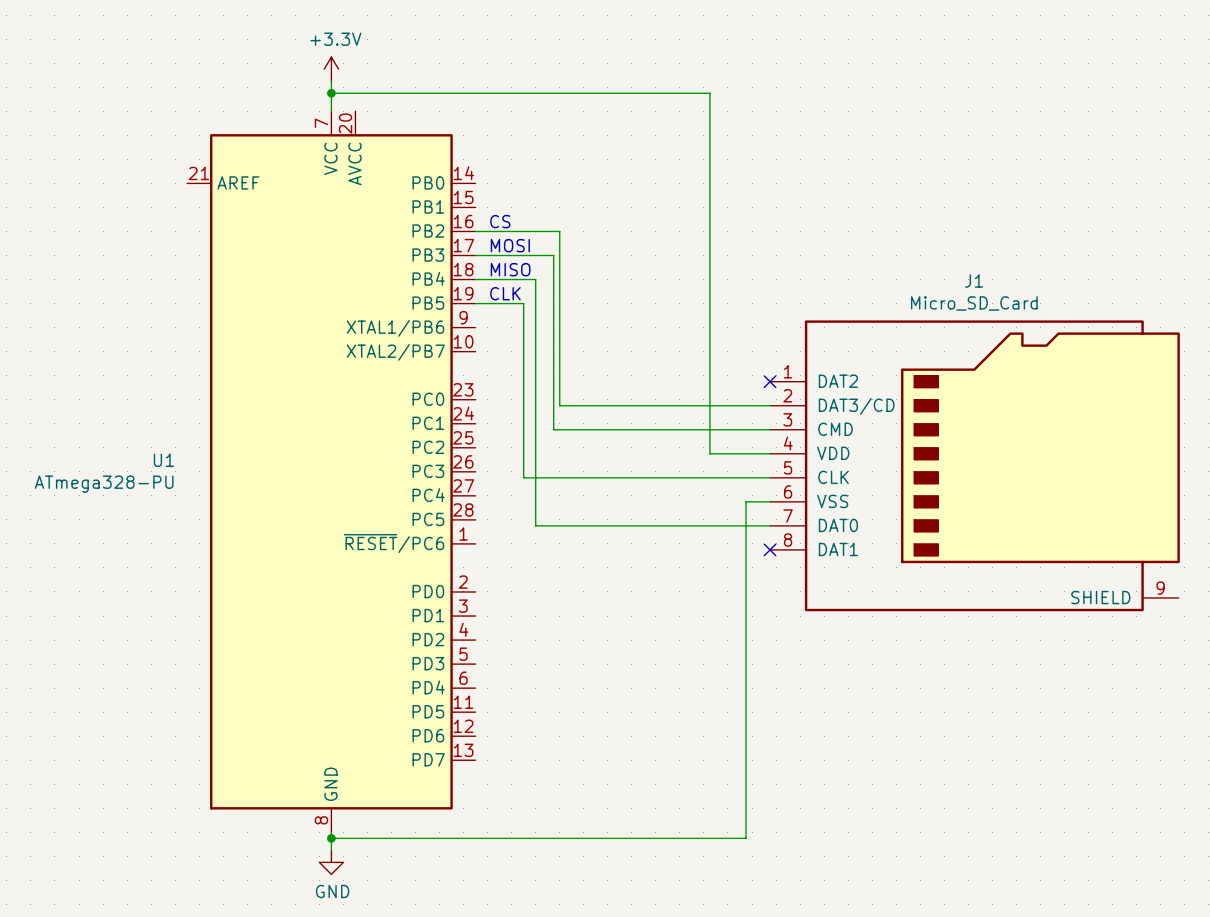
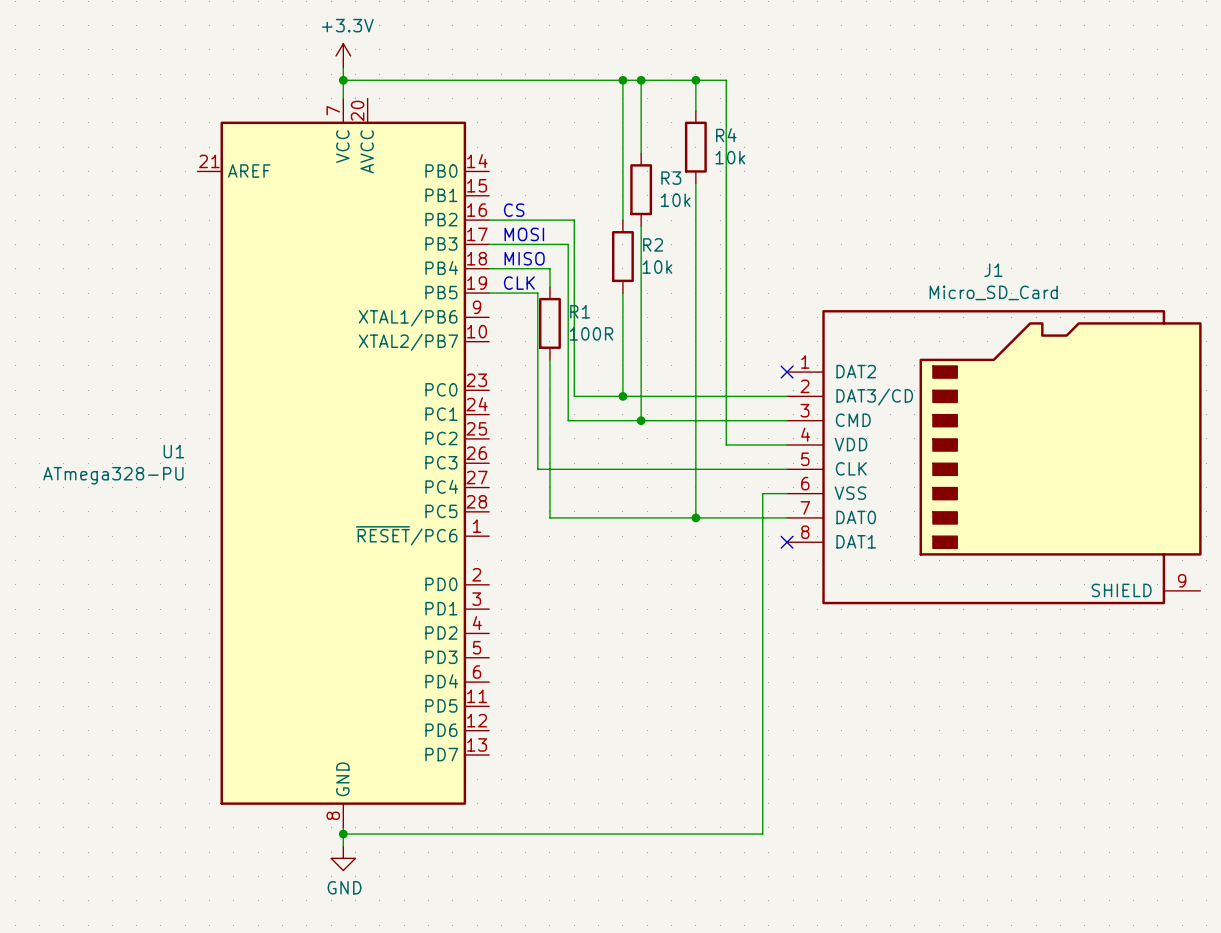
wire: none -> (622, 80) (622, 220)
junction: none -> (622, 80)
junction: none -> (641, 80)
wire: none -> (695, 80) (695, 110)
junction: none -> (695, 80)
R4: none -> 10k (695, 147)
wire: none -> (695, 183) (695, 517)
R3: none -> 10k (641, 189)
wire: none -> (641, 226) (641, 420)
R2: none -> 10k (622, 256)
wire: (535, 297) (535, 369) -> (641, 80) (641, 153)
wire: none -> (622, 293) (622, 396)
R1: none -> 100R (549, 323)
junction: none -> (622, 396)
junction: none -> (641, 420)
junction: none -> (695, 517)

